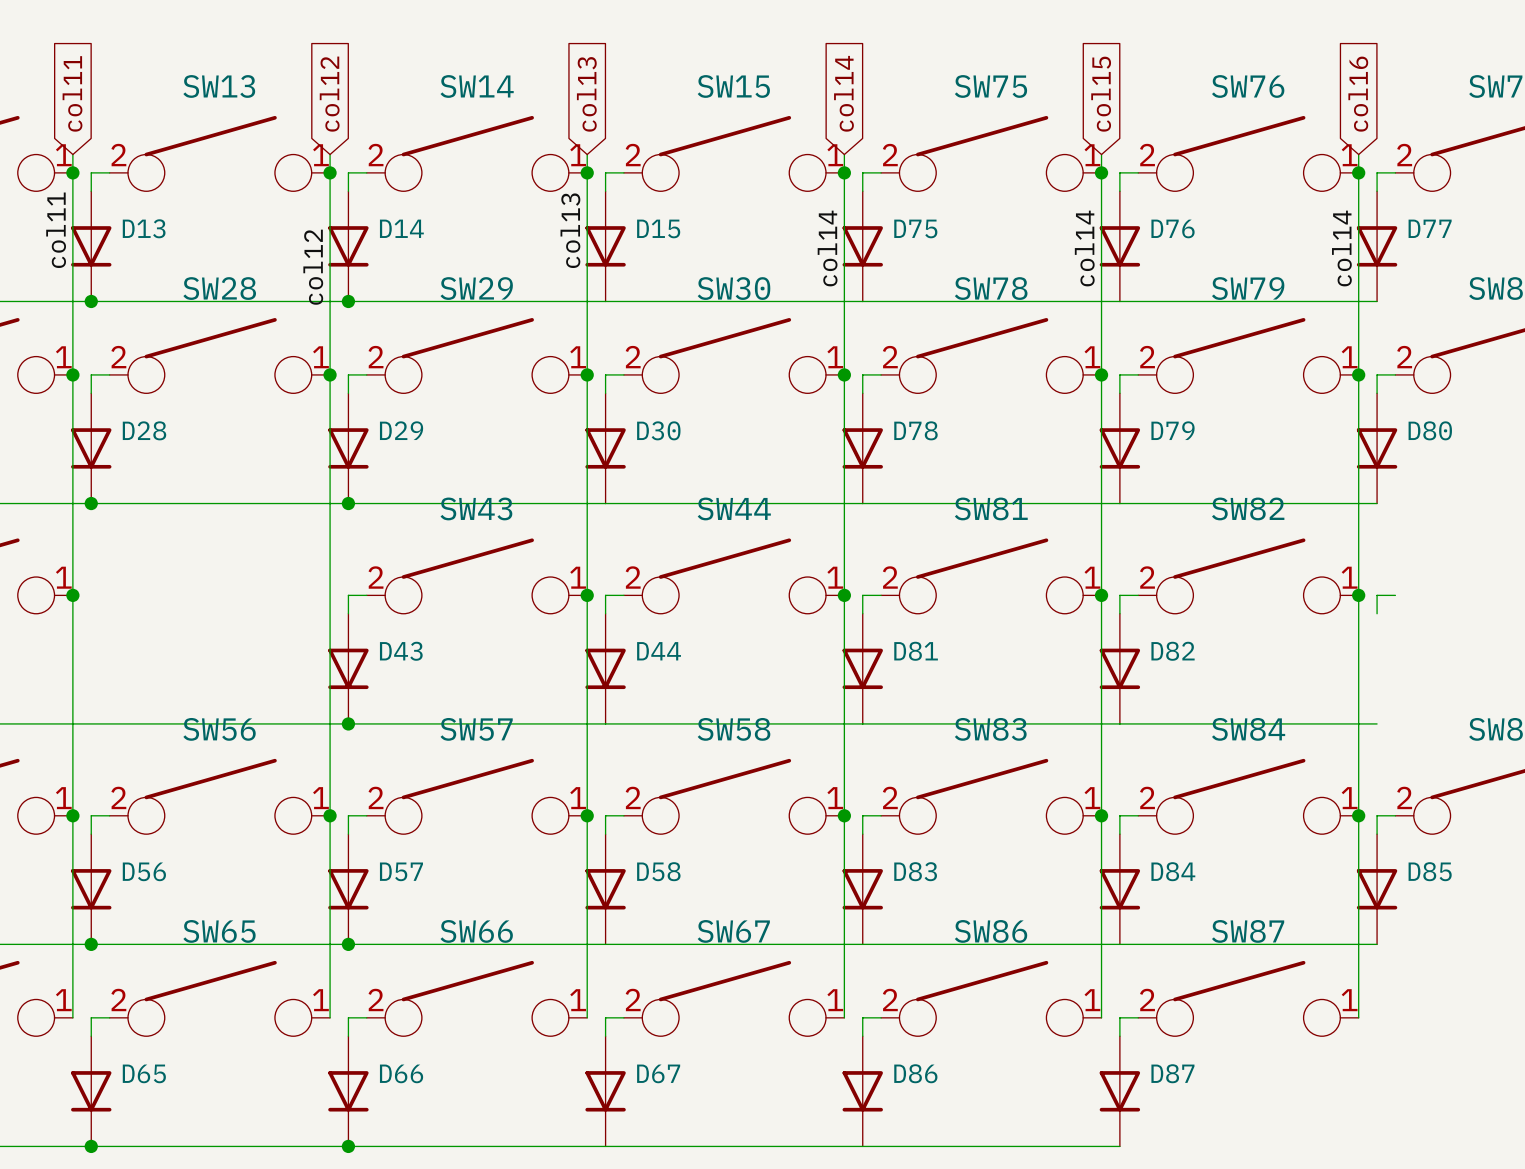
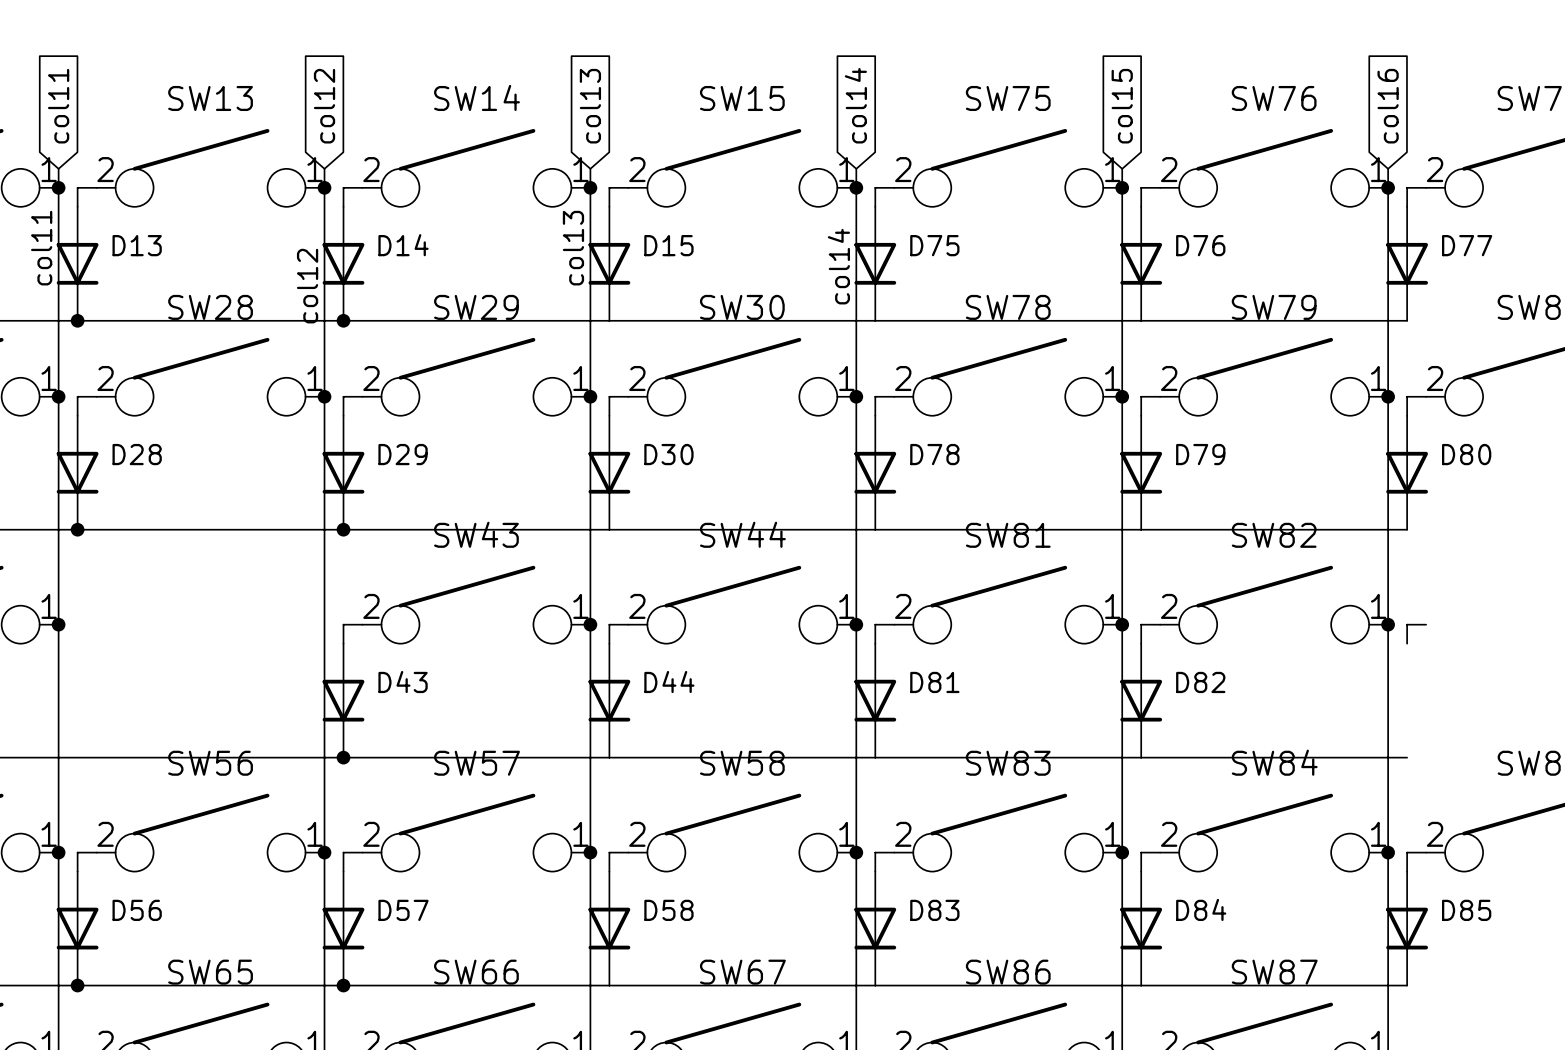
label: col14 (1084, 248) -> none
label: col14 (1341, 248) -> none

